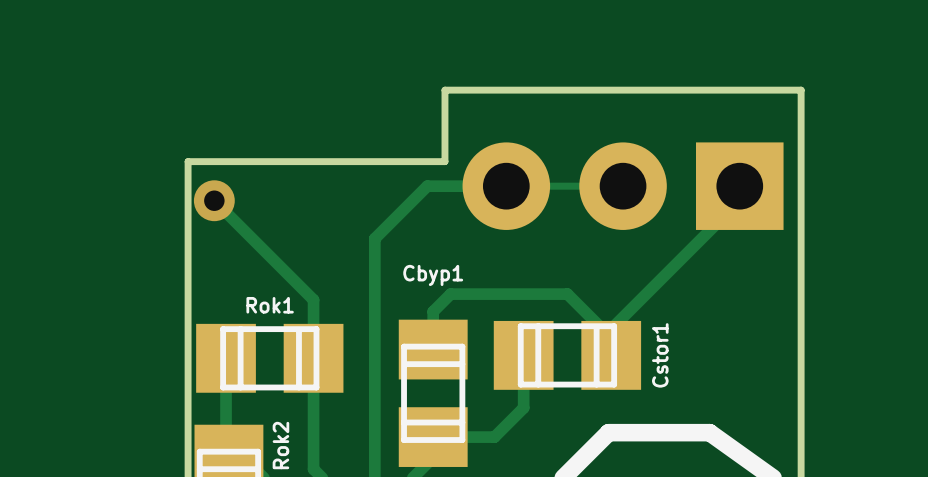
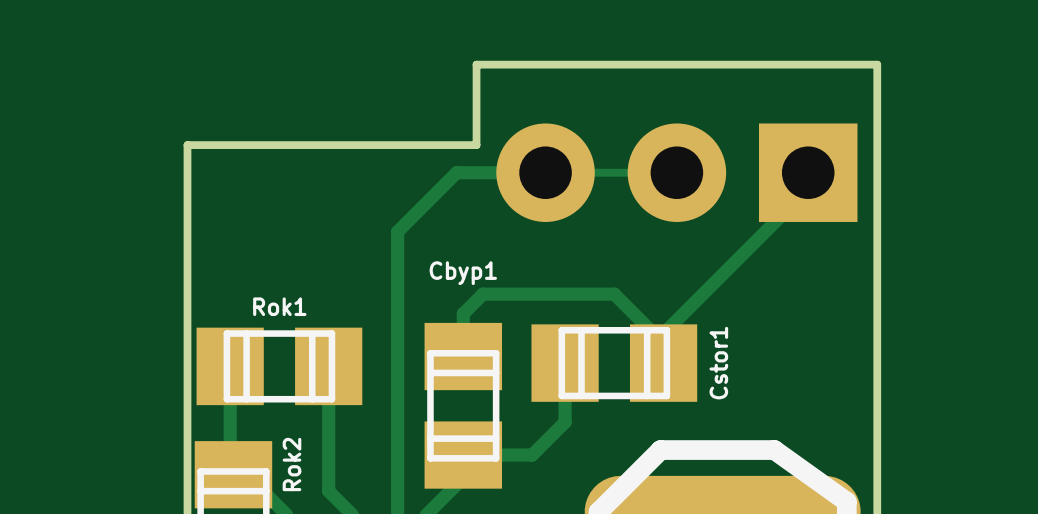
track: (214, 200) (313, 299) (313, 358) -> none
via: (214, 200) -> none

